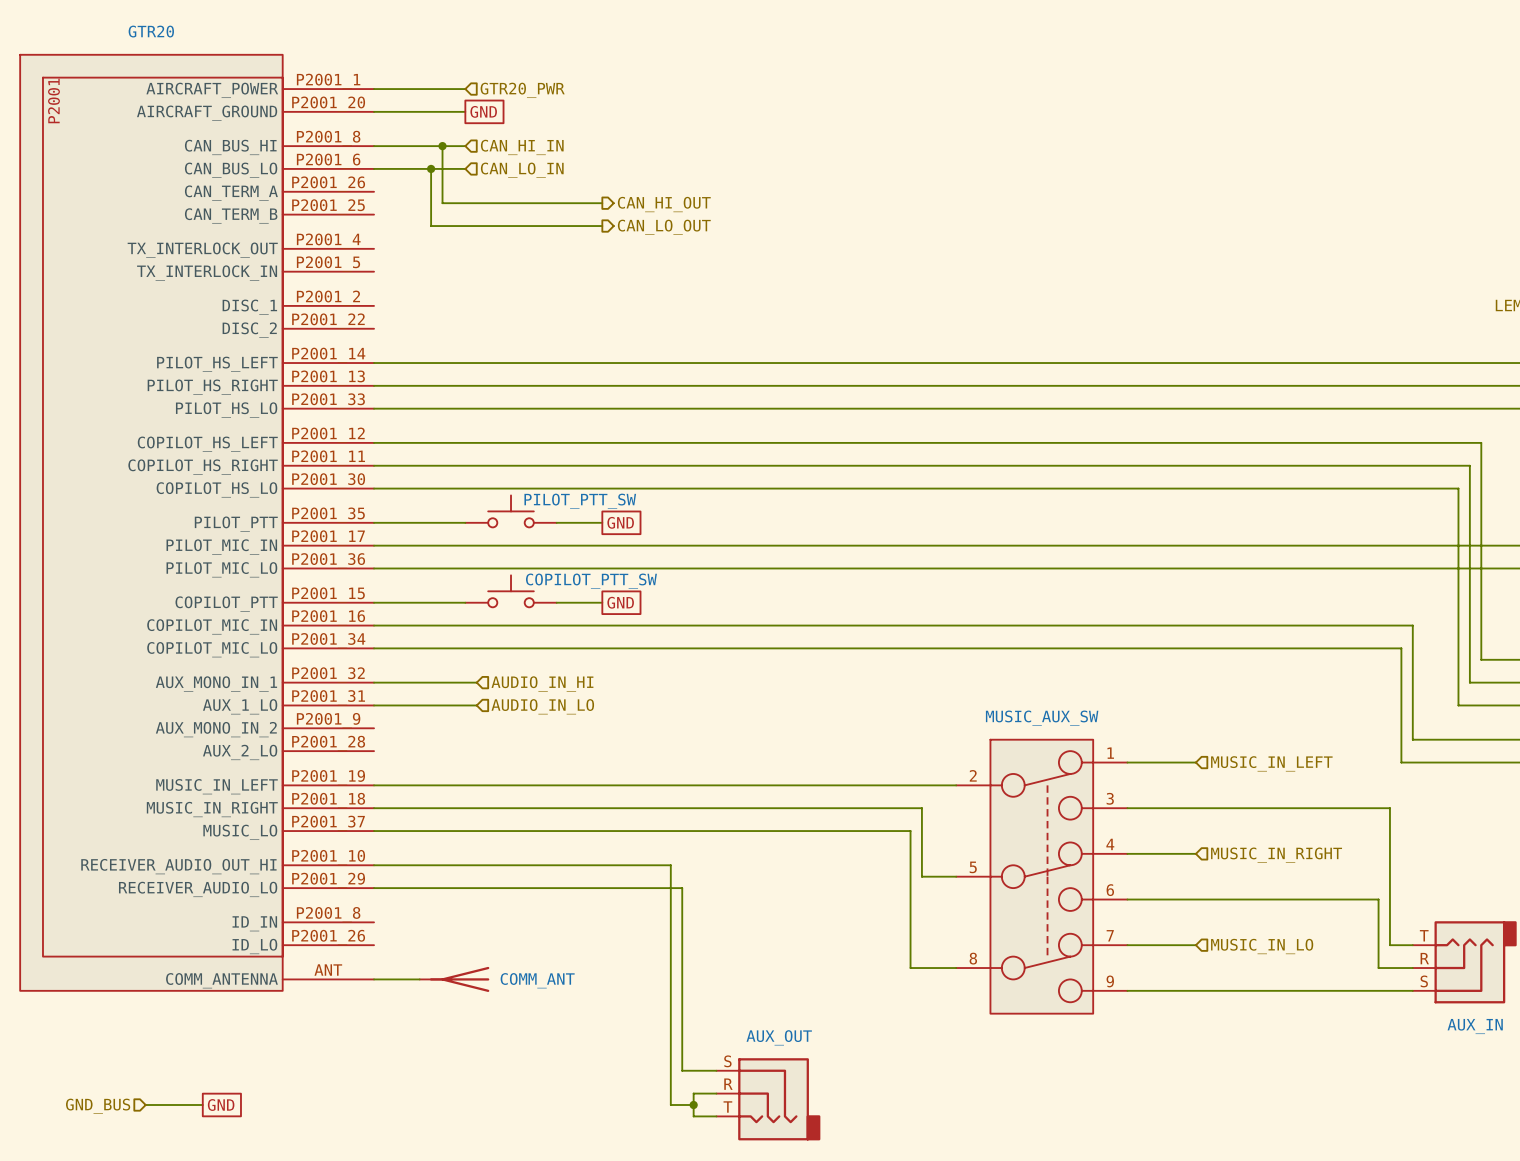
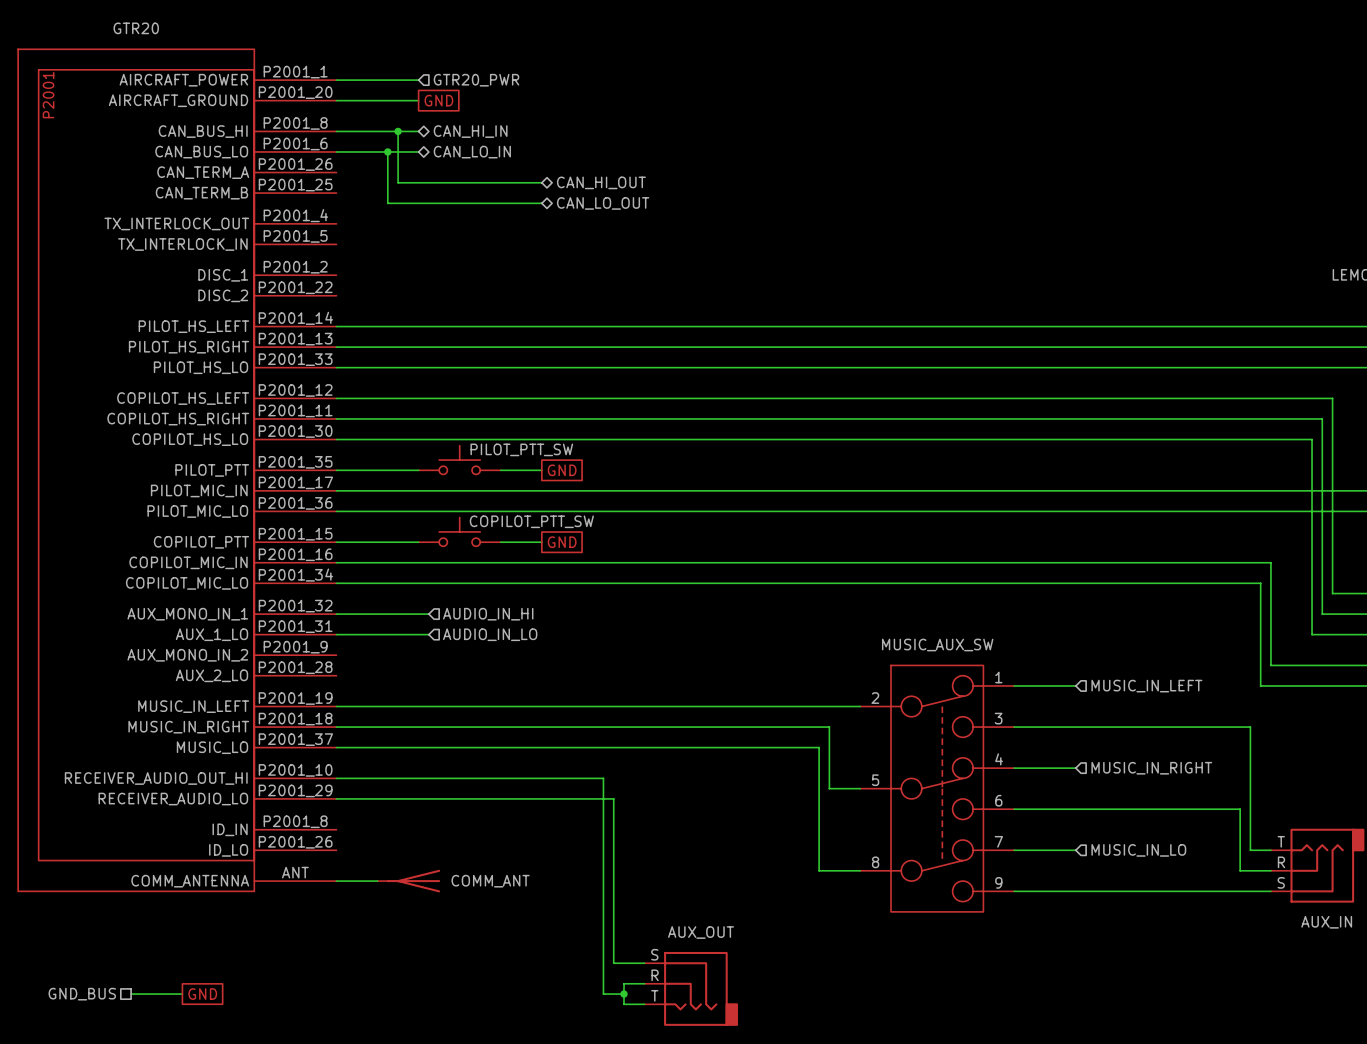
hierarchical label shape: input (522, 147) -> bidirectional (470, 131)
hierarchical label shape: input (522, 170) -> bidirectional (472, 152)
hierarchical label shape: output (664, 204) -> bidirectional (601, 182)
hierarchical label shape: output (664, 227) -> bidirectional (603, 203)
hierarchical label shape: input (98, 1106) -> passive (82, 994)

